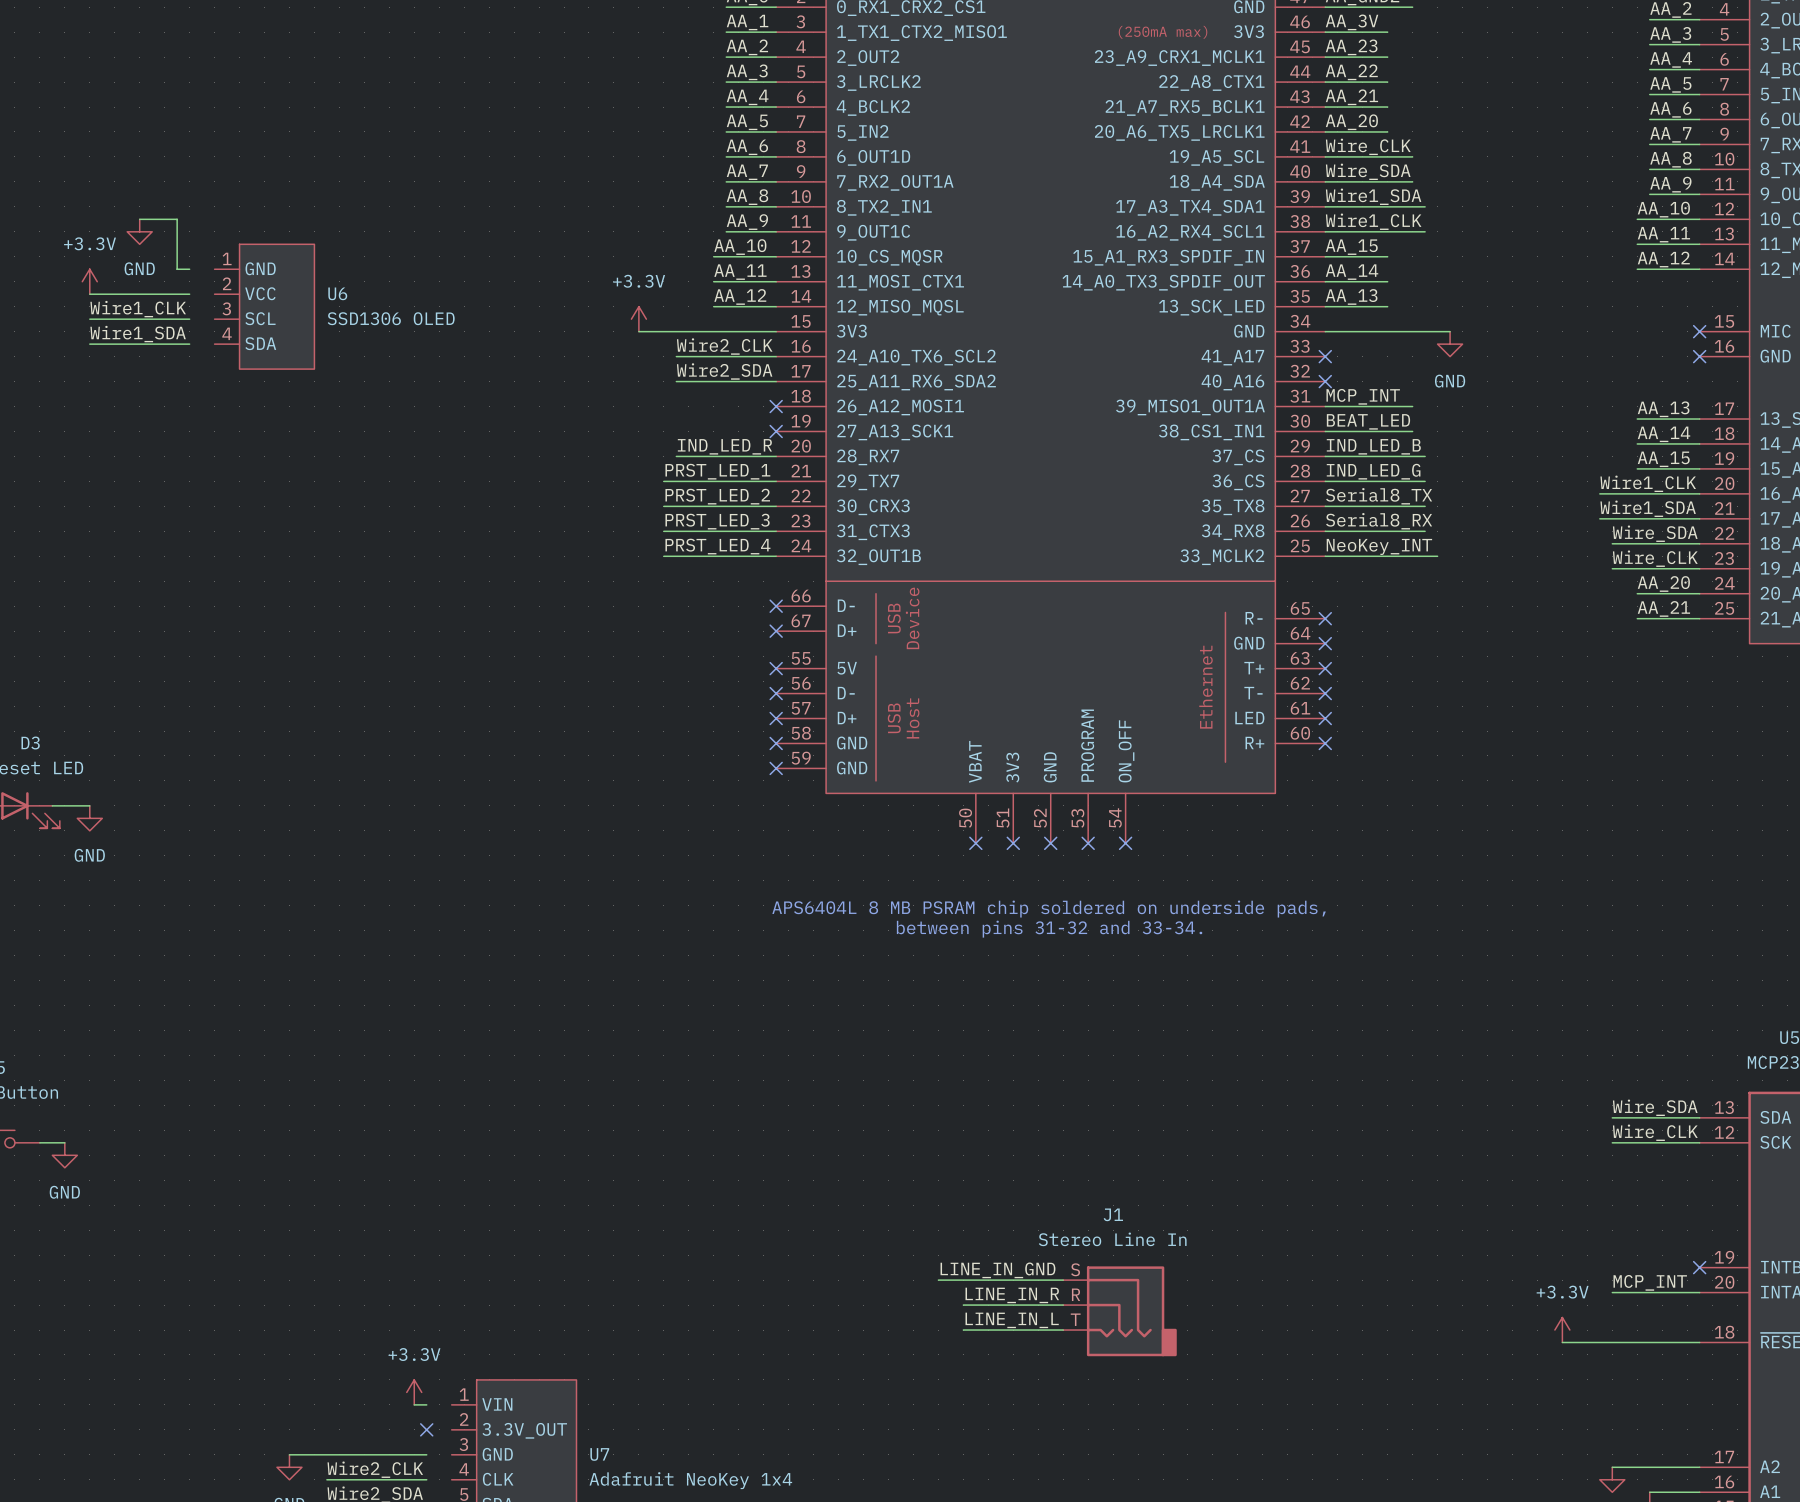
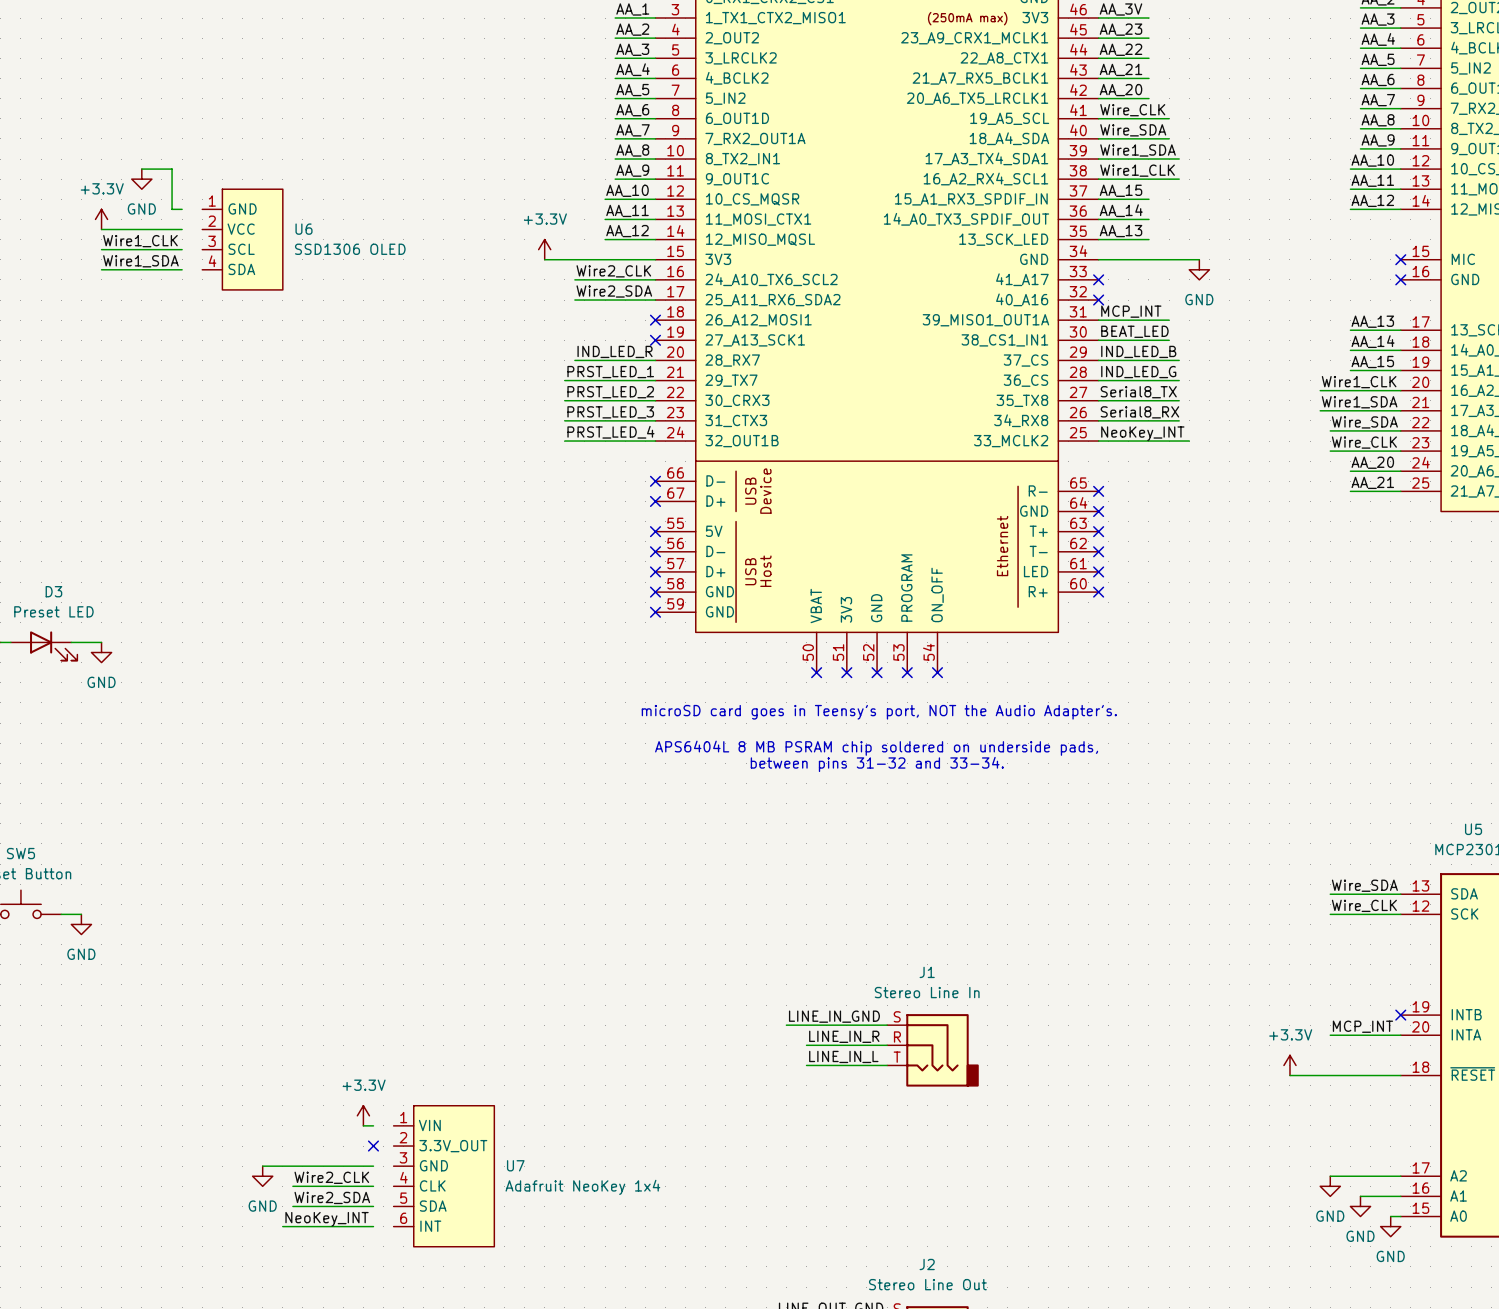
text: none -> microSD card goes in Teensy's port, NOT the Audio Adapter's. (879, 712)
text: APS6404L 8 MB PSRAM chip soldered on underside pads, (1049, 909) -> none
text: between pins 31-32 and 33-34. (1049, 929) -> APS6404L 8 MB PSRAM chip soldered on underside pads, (876, 748)
text: none -> between pins 31-32 and 33-34. (877, 764)

